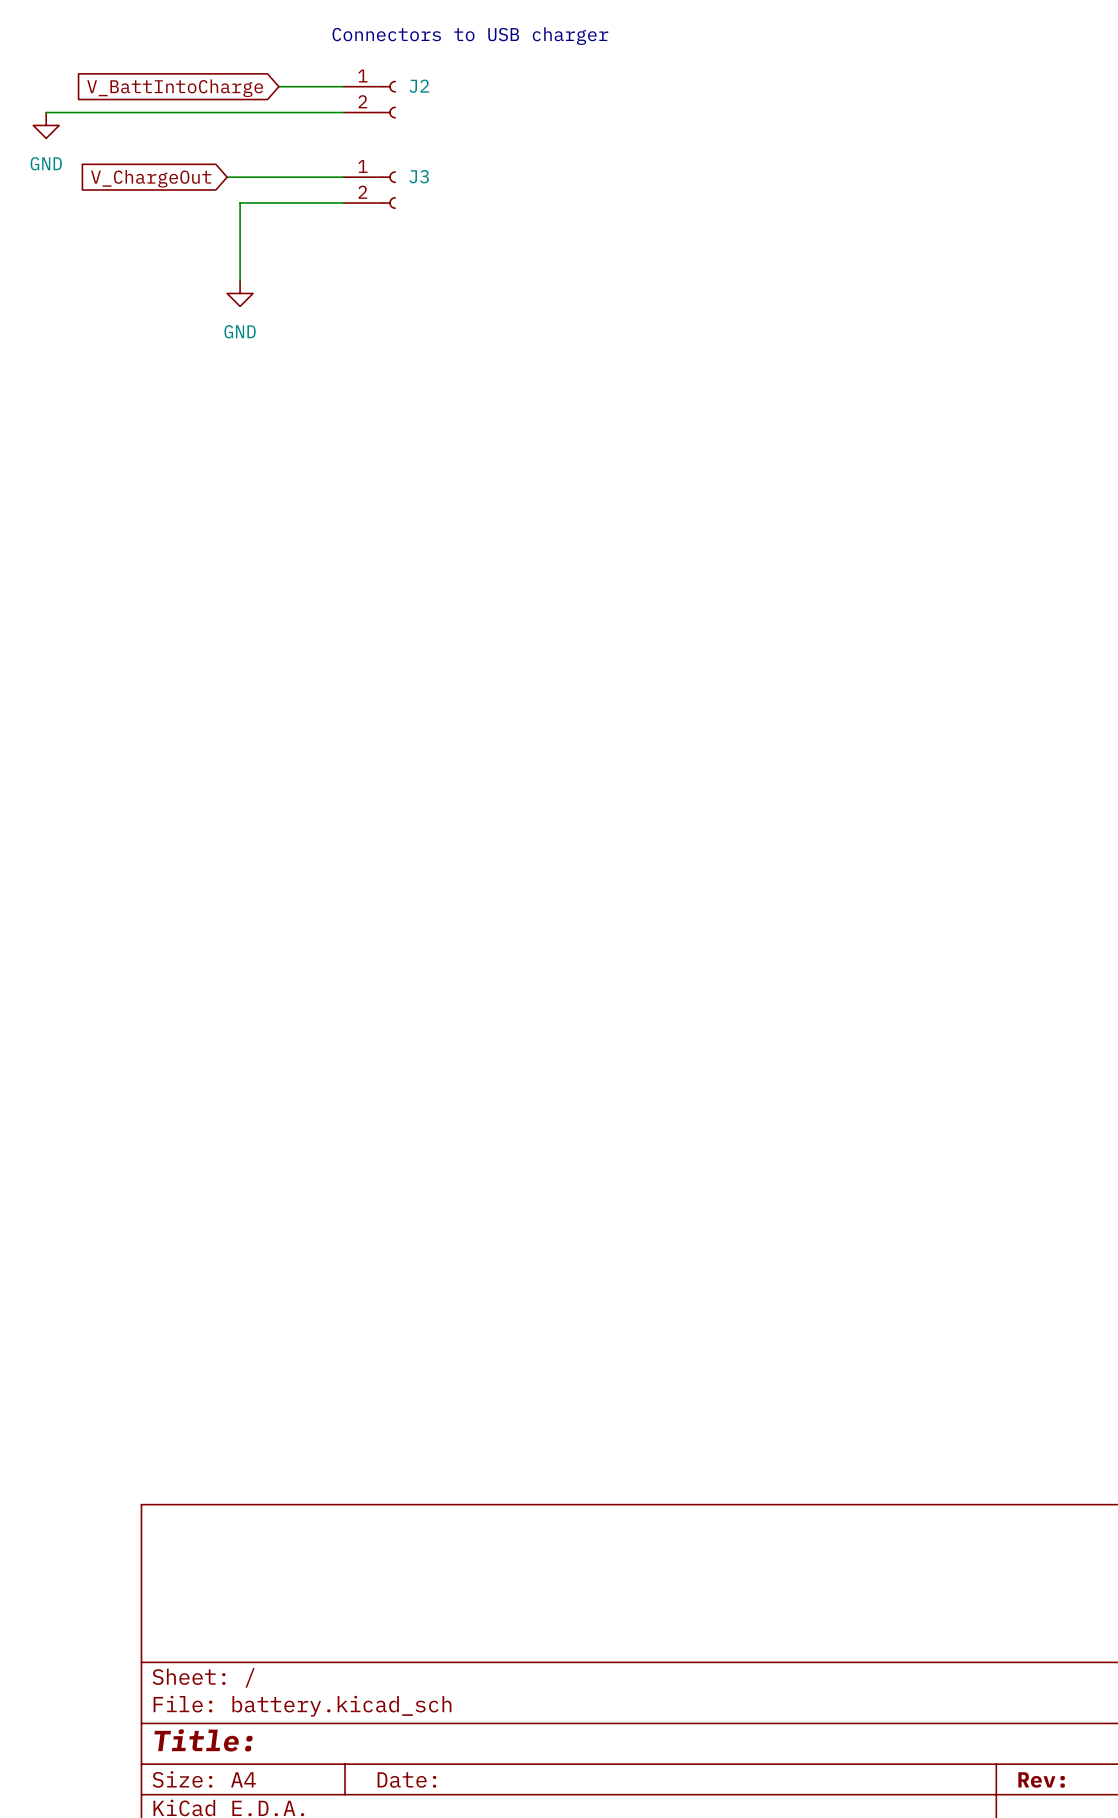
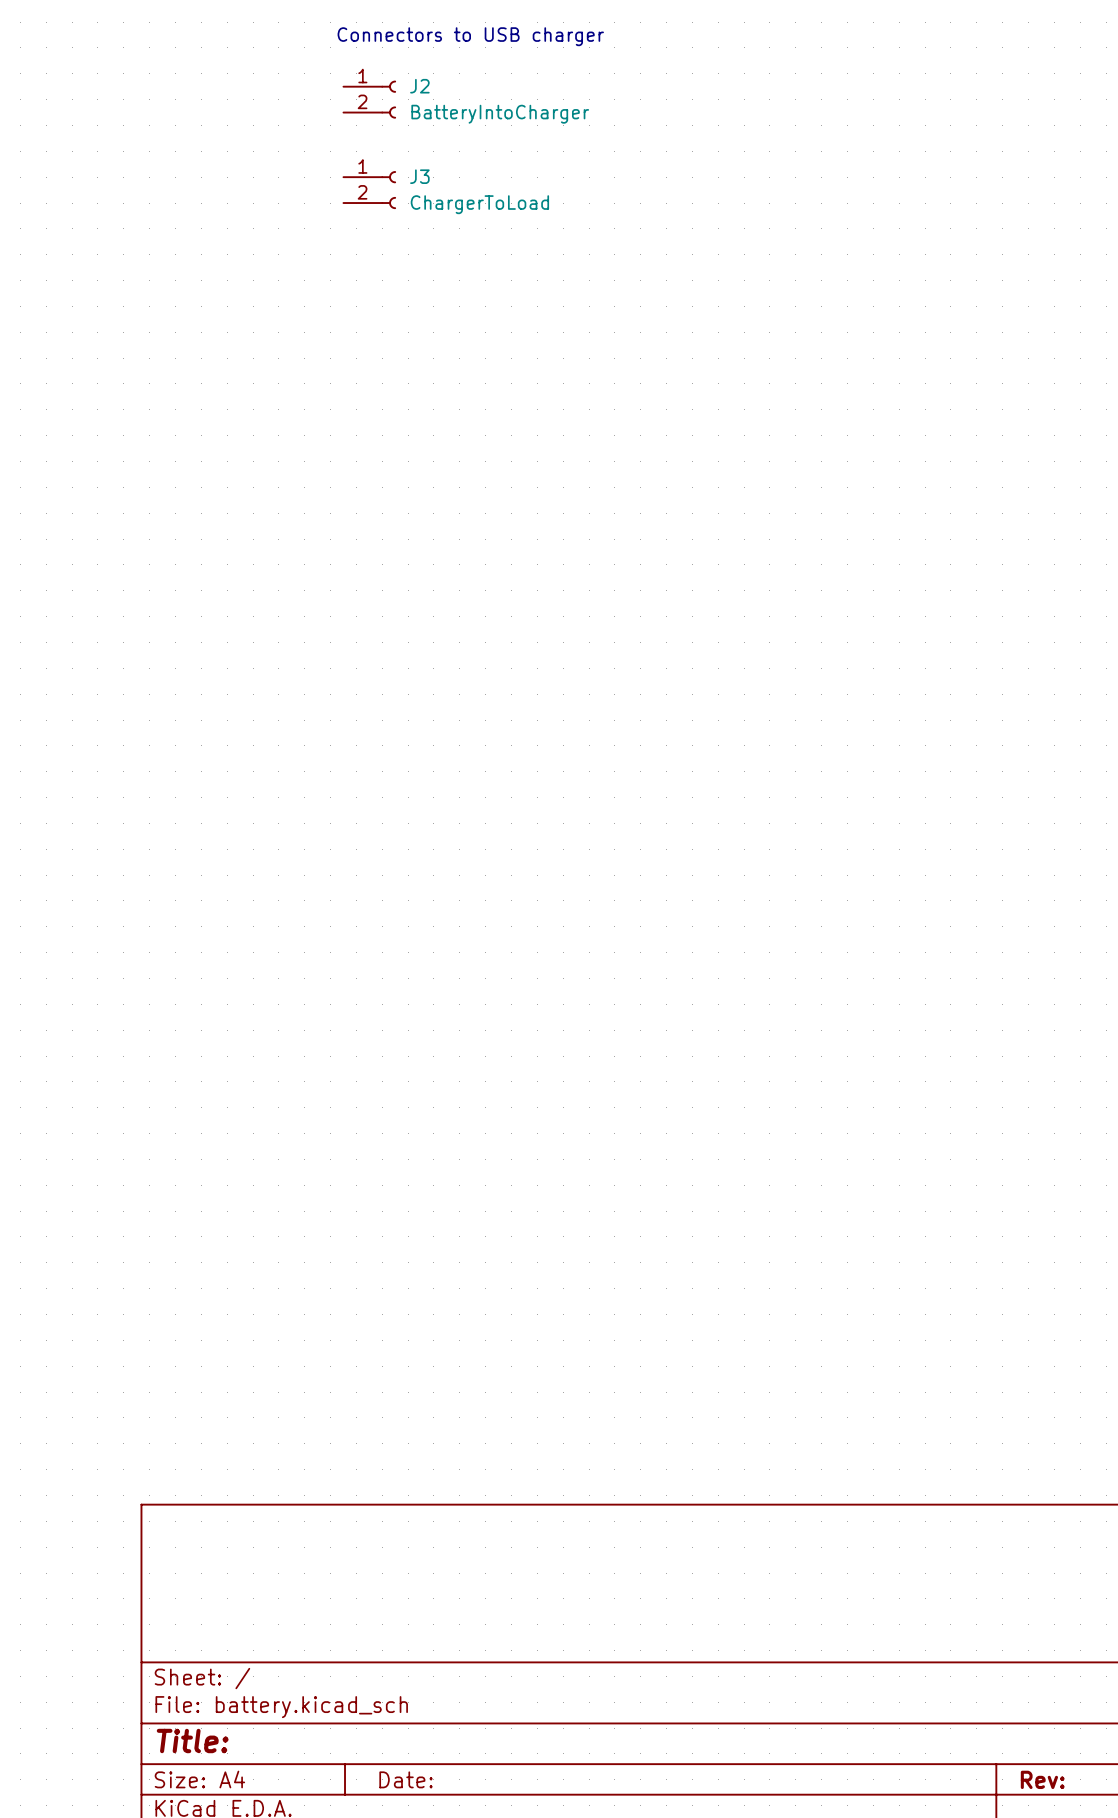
wire: (278, 86) (343, 86) -> none
global label: V_BattIntoCharge (175, 88) -> none
wire: (46, 112) (343, 112) -> none
J2 value: none -> BatteryIntoCharger (500, 114)
power symbol: GND (46, 125) -> none
wire: (227, 177) (343, 177) -> none
global label: V_ChargeOut (151, 178) -> none
wire: (343, 203) (240, 203) (240, 280) -> none
J3 value: none -> ChargerToLoad (479, 204)
power symbol: GND (240, 293) -> none

